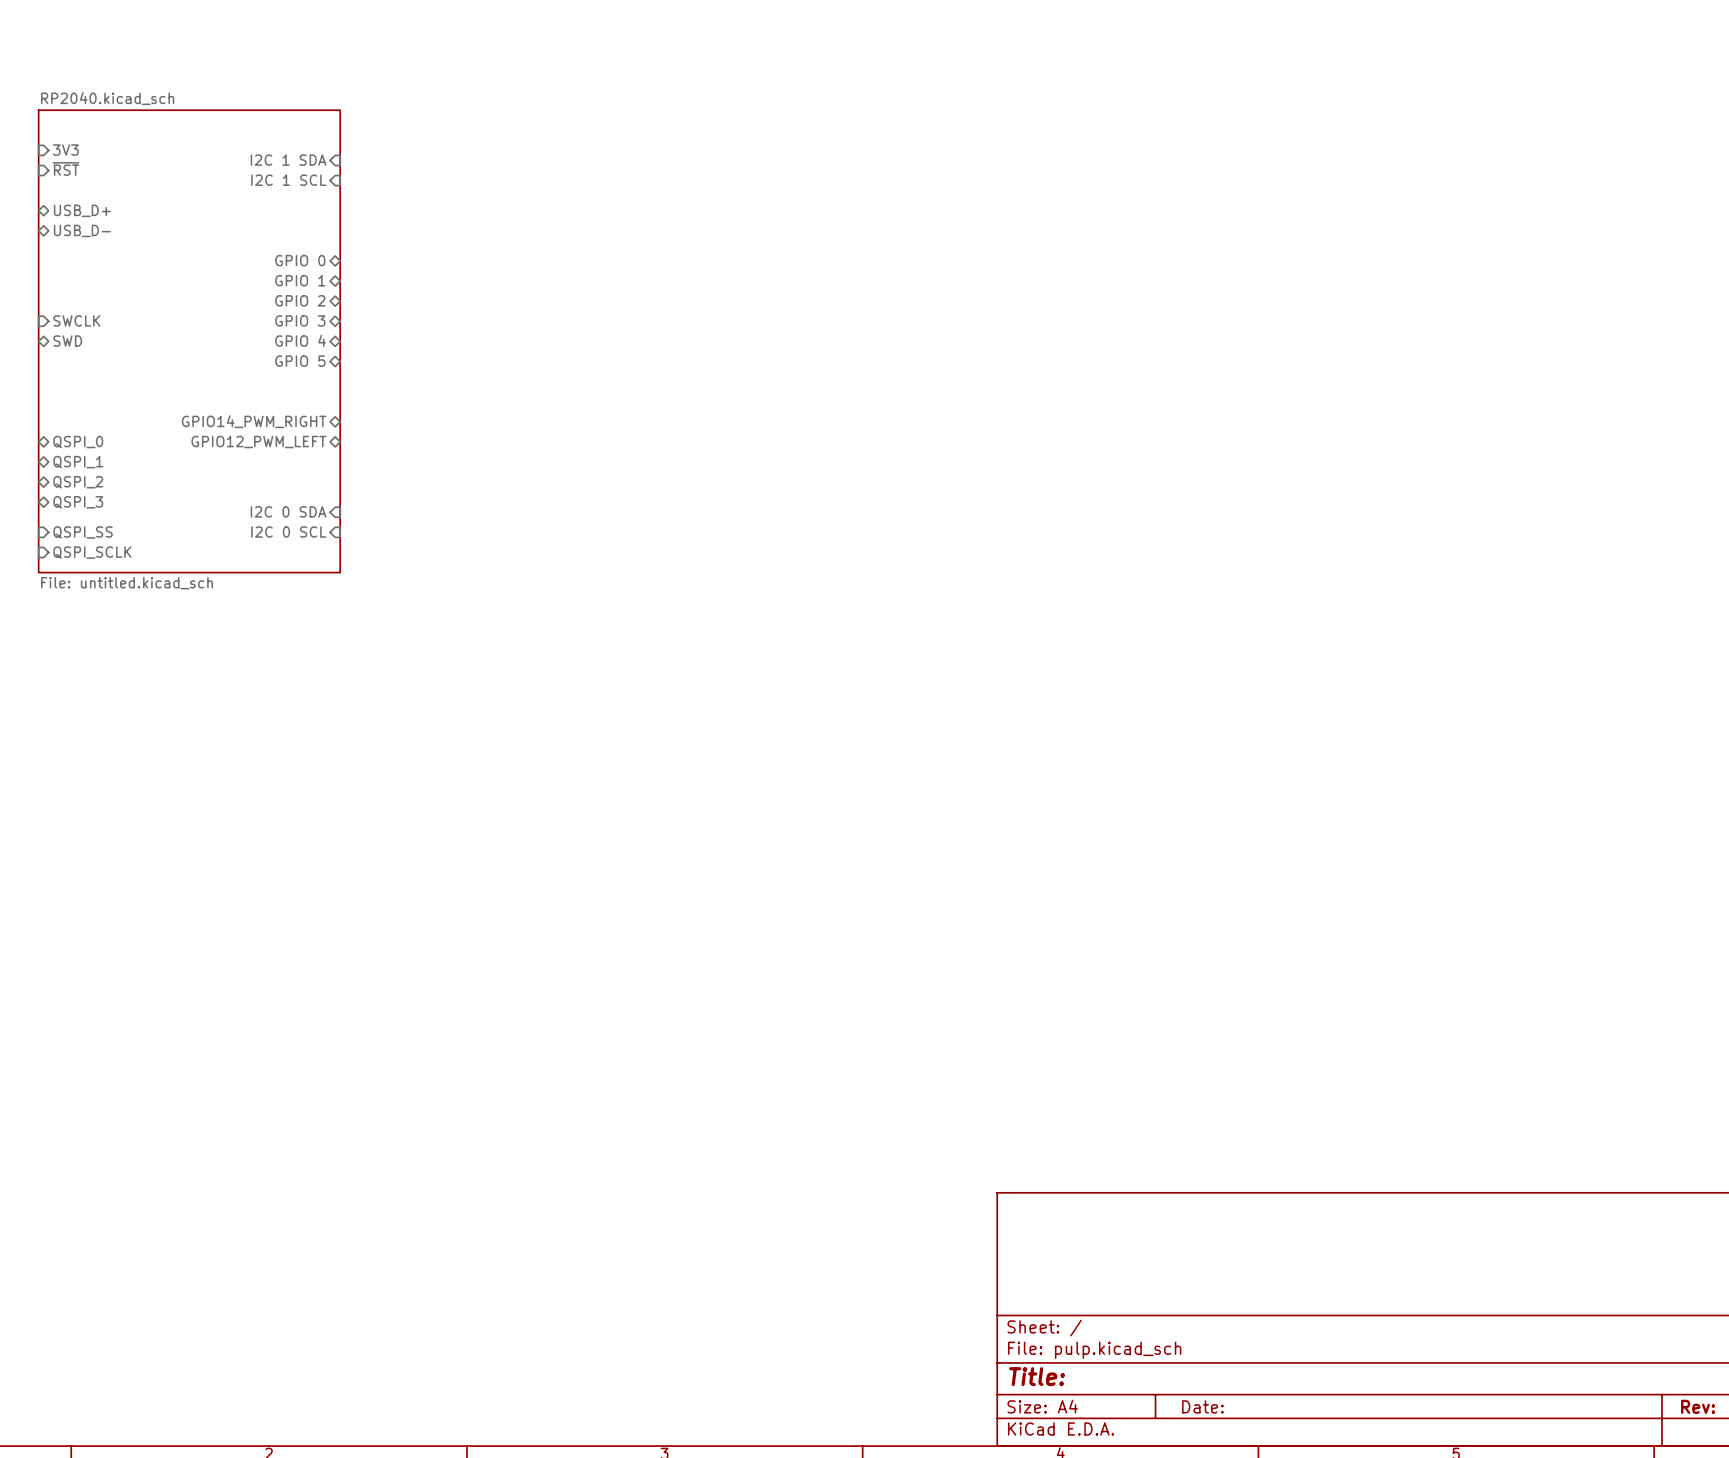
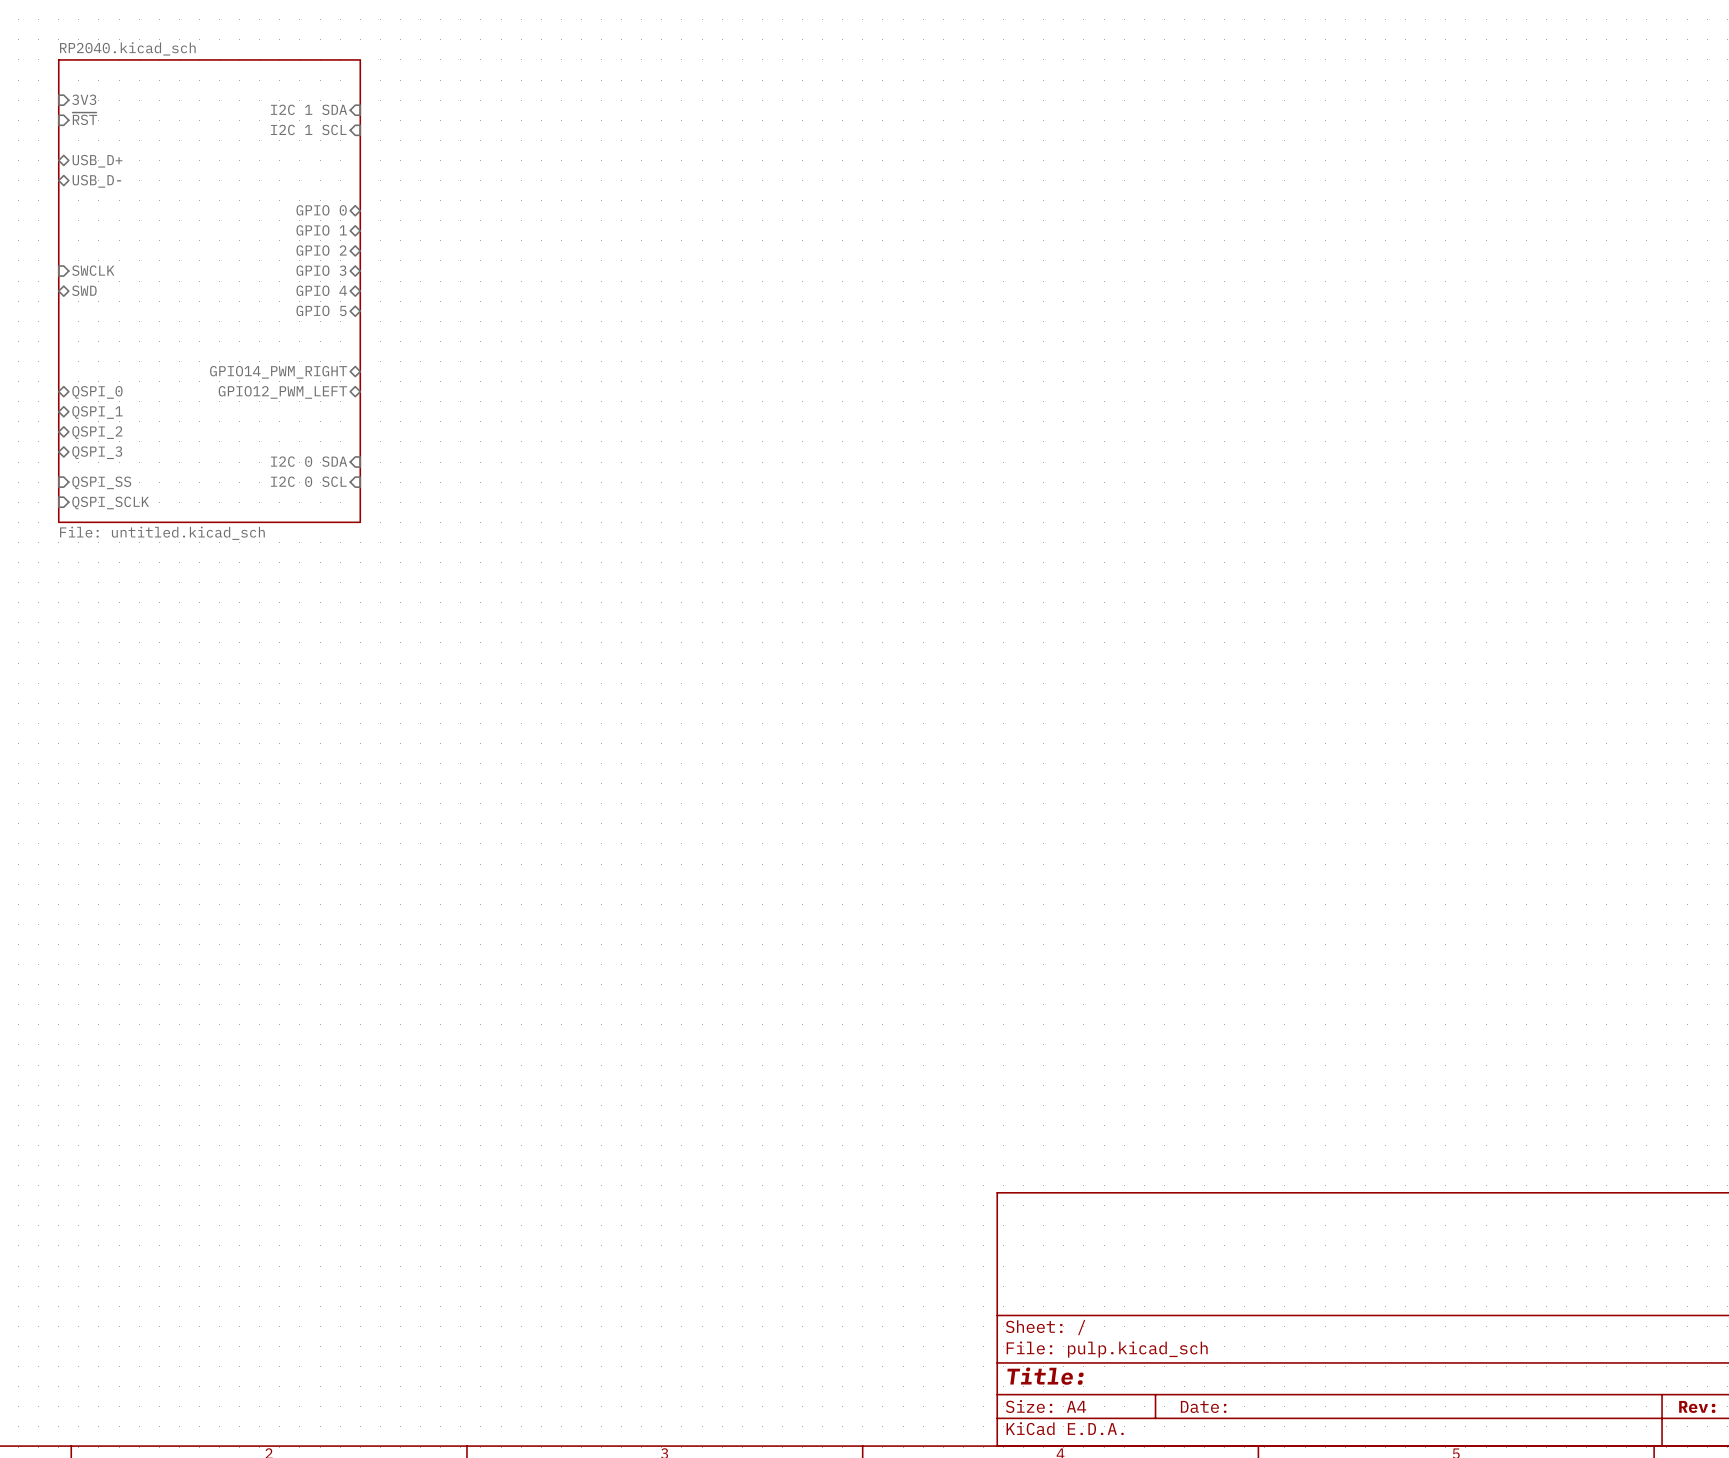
sheet pin position: 3V3 (65, 150) -> 3V3 (84, 99)
sheet pin position: I2C 1 SDA (288, 160) -> I2C 1 SDA (309, 109)
sheet pin position: ~{RST} (65, 168) -> ~{RST} (84, 118)
sheet pin position: I2C 1 SCL (288, 180) -> I2C 1 SCL (308, 129)
sheet pin position: USB_D+ (82, 210) -> USB_D+ (97, 161)
sheet pin position: USB_D- (82, 230) -> USB_D- (96, 181)
sheet pin position: GPIO 0 (300, 260) -> GPIO 0 (321, 210)
sheet pin position: GPIO 1 (300, 280) -> GPIO 1 (321, 230)
sheet pin position: GPIO 2 (300, 300) -> GPIO 2 (321, 250)
sheet pin position: SWCLK (76, 320) -> SWCLK (93, 270)
sheet pin position: GPIO 3 (300, 320) -> GPIO 3 (321, 270)
sheet pin position: GPIO 4 (300, 340) -> GPIO 4 (321, 290)
sheet pin position: SWD (67, 341) -> SWD (84, 290)
sheet RP2040.kicad_sch position: (189, 341) -> (209, 291)
sheet pin position: GPIO 5 (300, 361) -> GPIO 5 (321, 310)
sheet pin position: GPIO14_PWM_RIGHT (254, 421) -> GPIO14_PWM_RIGHT (278, 372)
sheet pin position: QSPI_0 (78, 442) -> QSPI_0 (97, 392)
sheet pin position: GPIO12_PWM_LEFT (258, 442) -> GPIO12_PWM_LEFT (282, 392)
sheet pin position: QSPI_1 (78, 462) -> QSPI_1 (97, 412)
sheet pin position: QSPI_2 (78, 482) -> QSPI_2 (97, 432)
sheet pin position: QSPI_3 (78, 502) -> QSPI_3 (97, 452)
sheet pin position: I2C 0 SDA (288, 511) -> I2C 0 SDA (309, 461)
sheet pin position: I2C 0 SCL (288, 531) -> I2C 0 SCL (308, 481)
sheet pin position: QSPI_SS (83, 532) -> QSPI_SS (101, 482)
sheet pin position: QSPI_SCLK (92, 552) -> QSPI_SCLK (110, 502)

